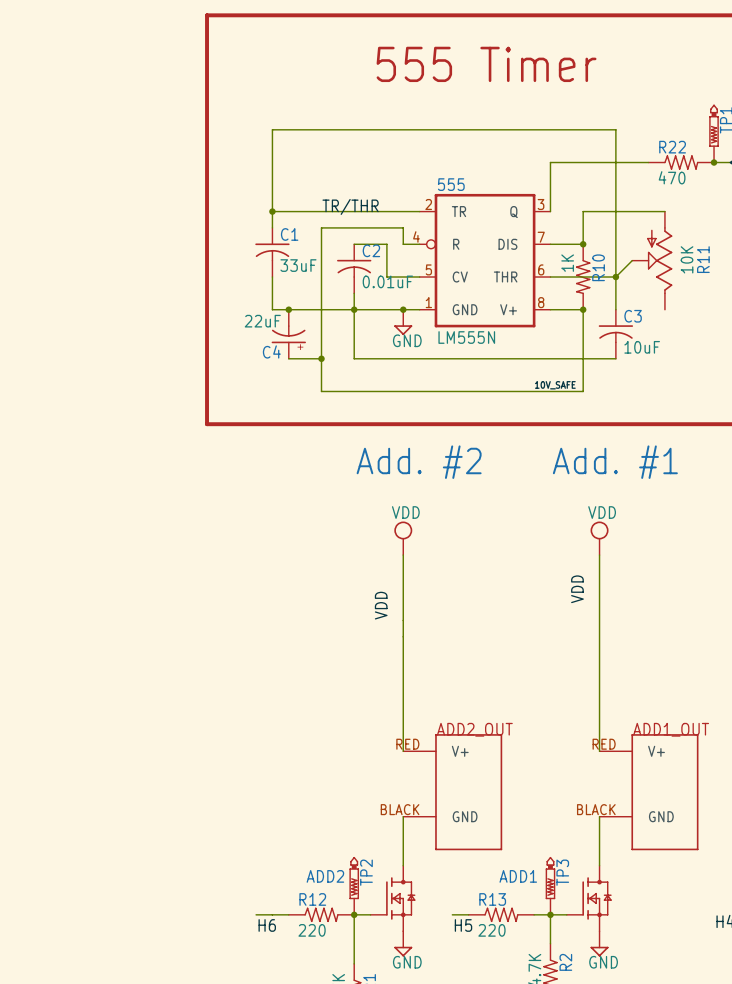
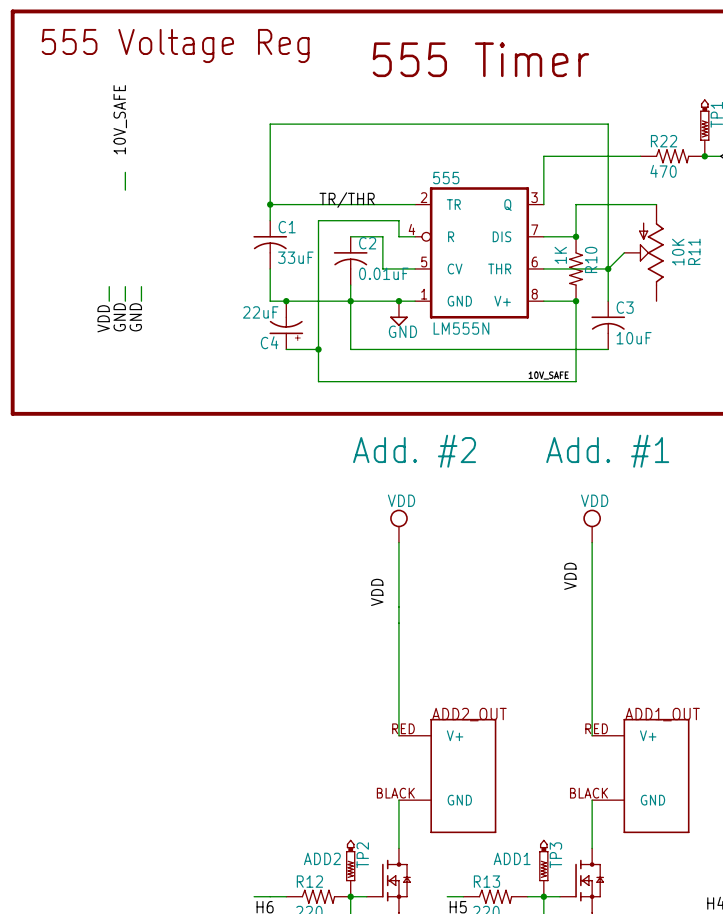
line: (207, 15) (207, 424) -> (205, 11) (12, 11) (12, 413) (205, 413)
text: none -> 555 Voltage Reg (175, 45)
label: none -> 10V_SAFE (120, 119)
wire: none -> (125, 172) (125, 190)
wire: none -> (109, 286) (109, 301)
wire: none -> (125, 286) (125, 301)
wire: none -> (141, 286) (141, 301)
label: none -> GND (119, 317)
label: none -> GND (135, 317)
label: none -> VDD (103, 318)

